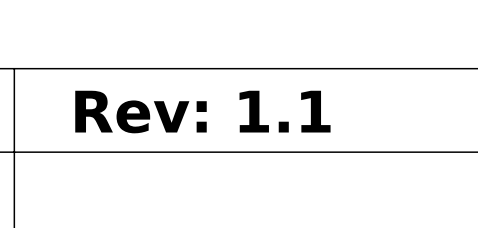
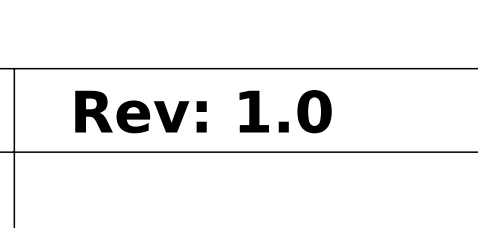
title block: Rev: 1.1 (202, 112) -> Rev: 1.0 (203, 111)

